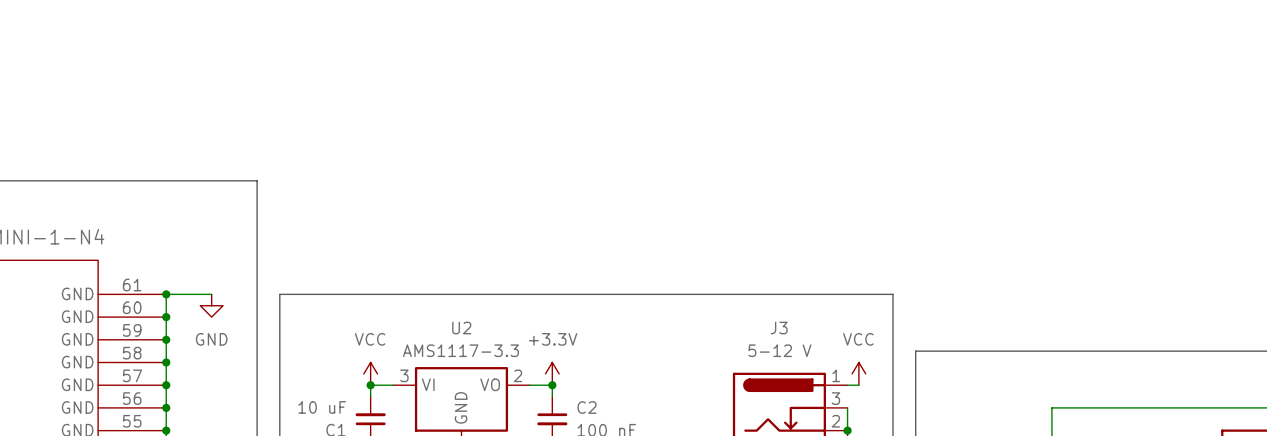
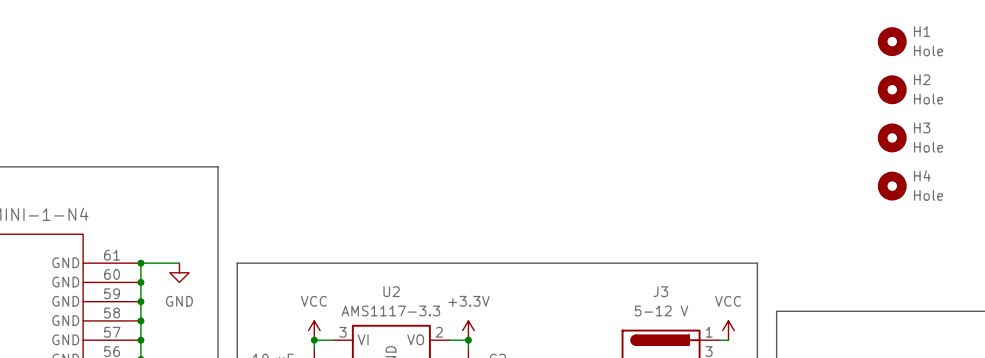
H1: none -> Hole (892, 41)
H2: none -> Hole (892, 89)
H3: none -> Hole (892, 137)
H4: none -> Hole (892, 186)

